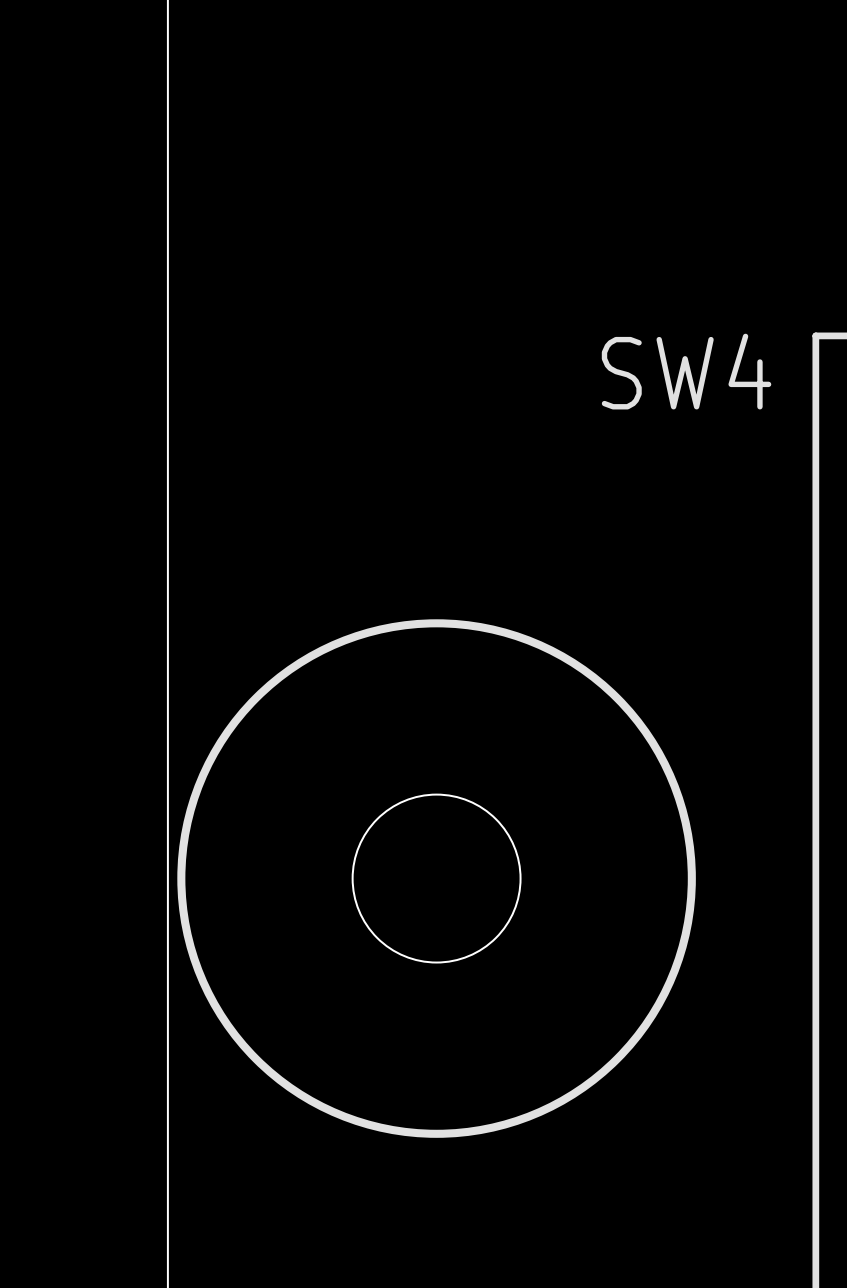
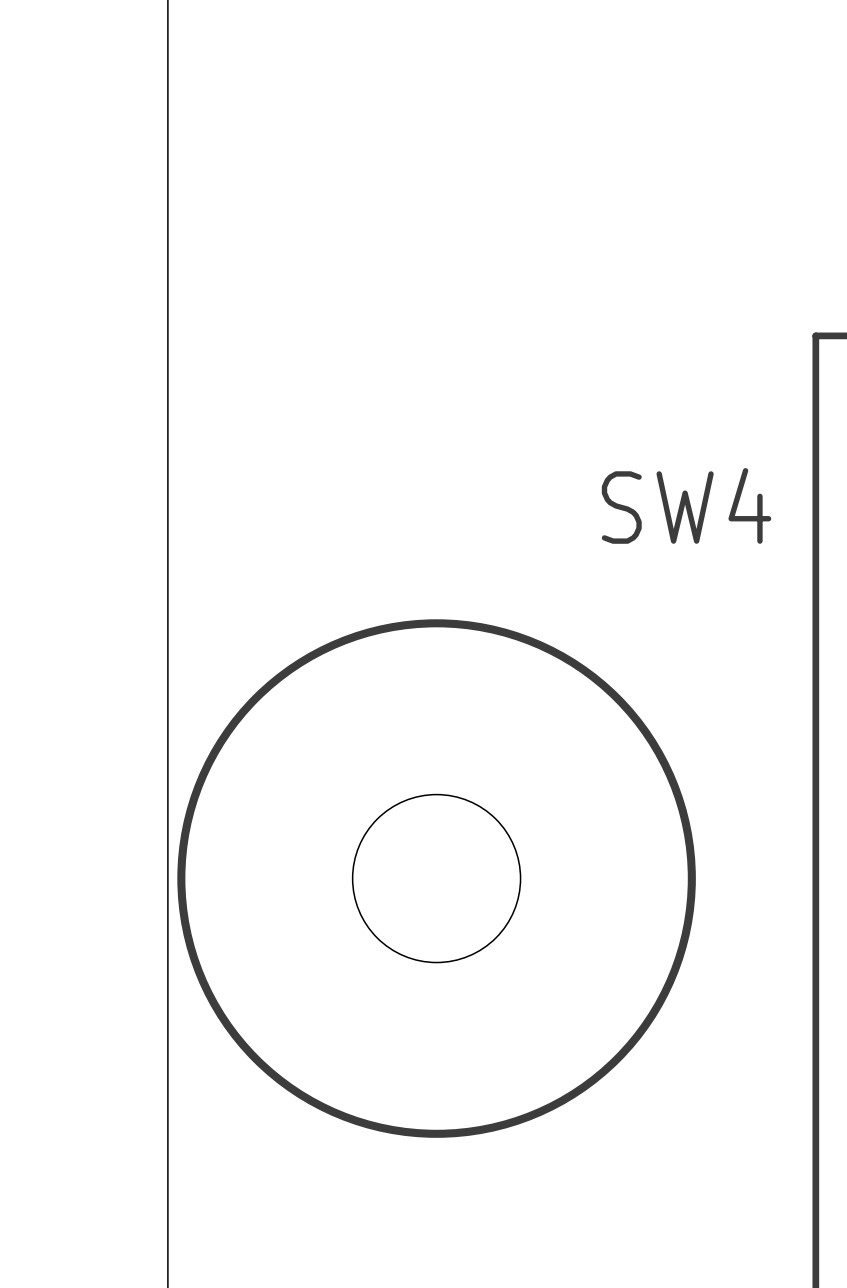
SW4 name position: SW4 (686, 371) -> SW4 (686, 505)

